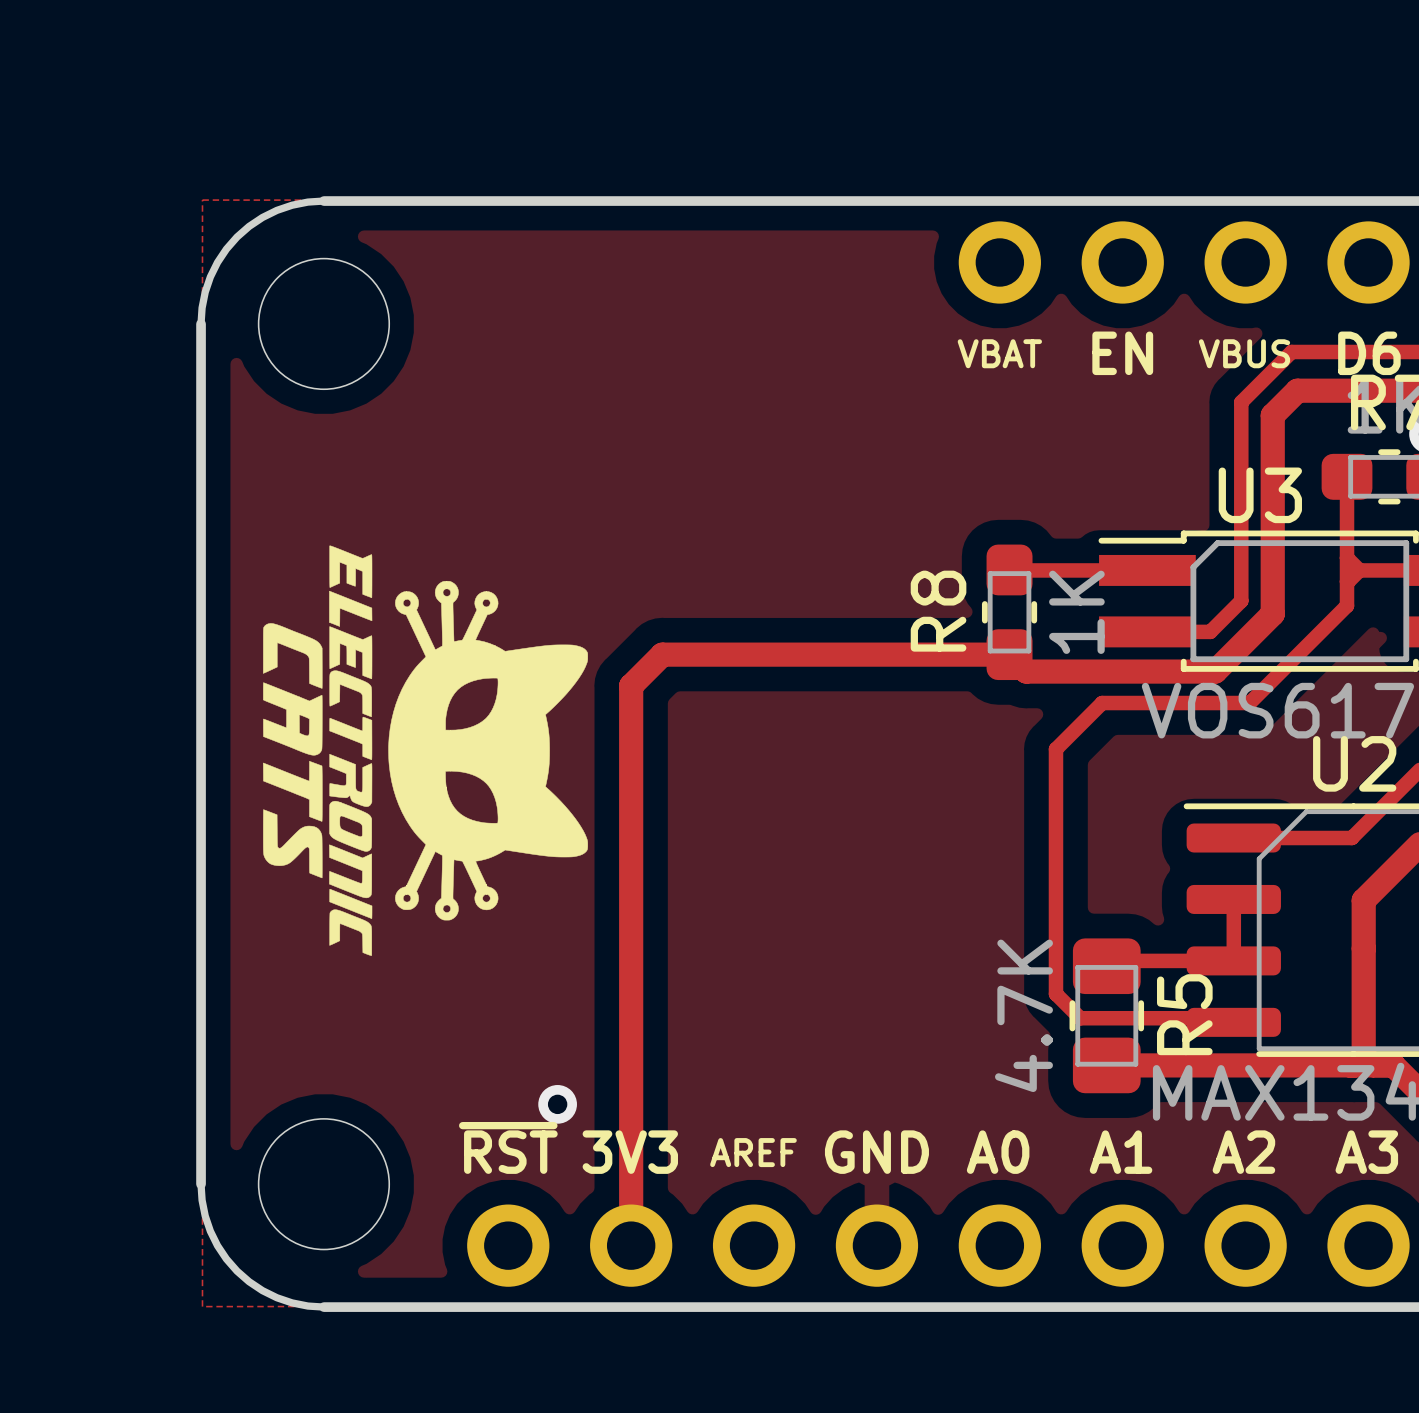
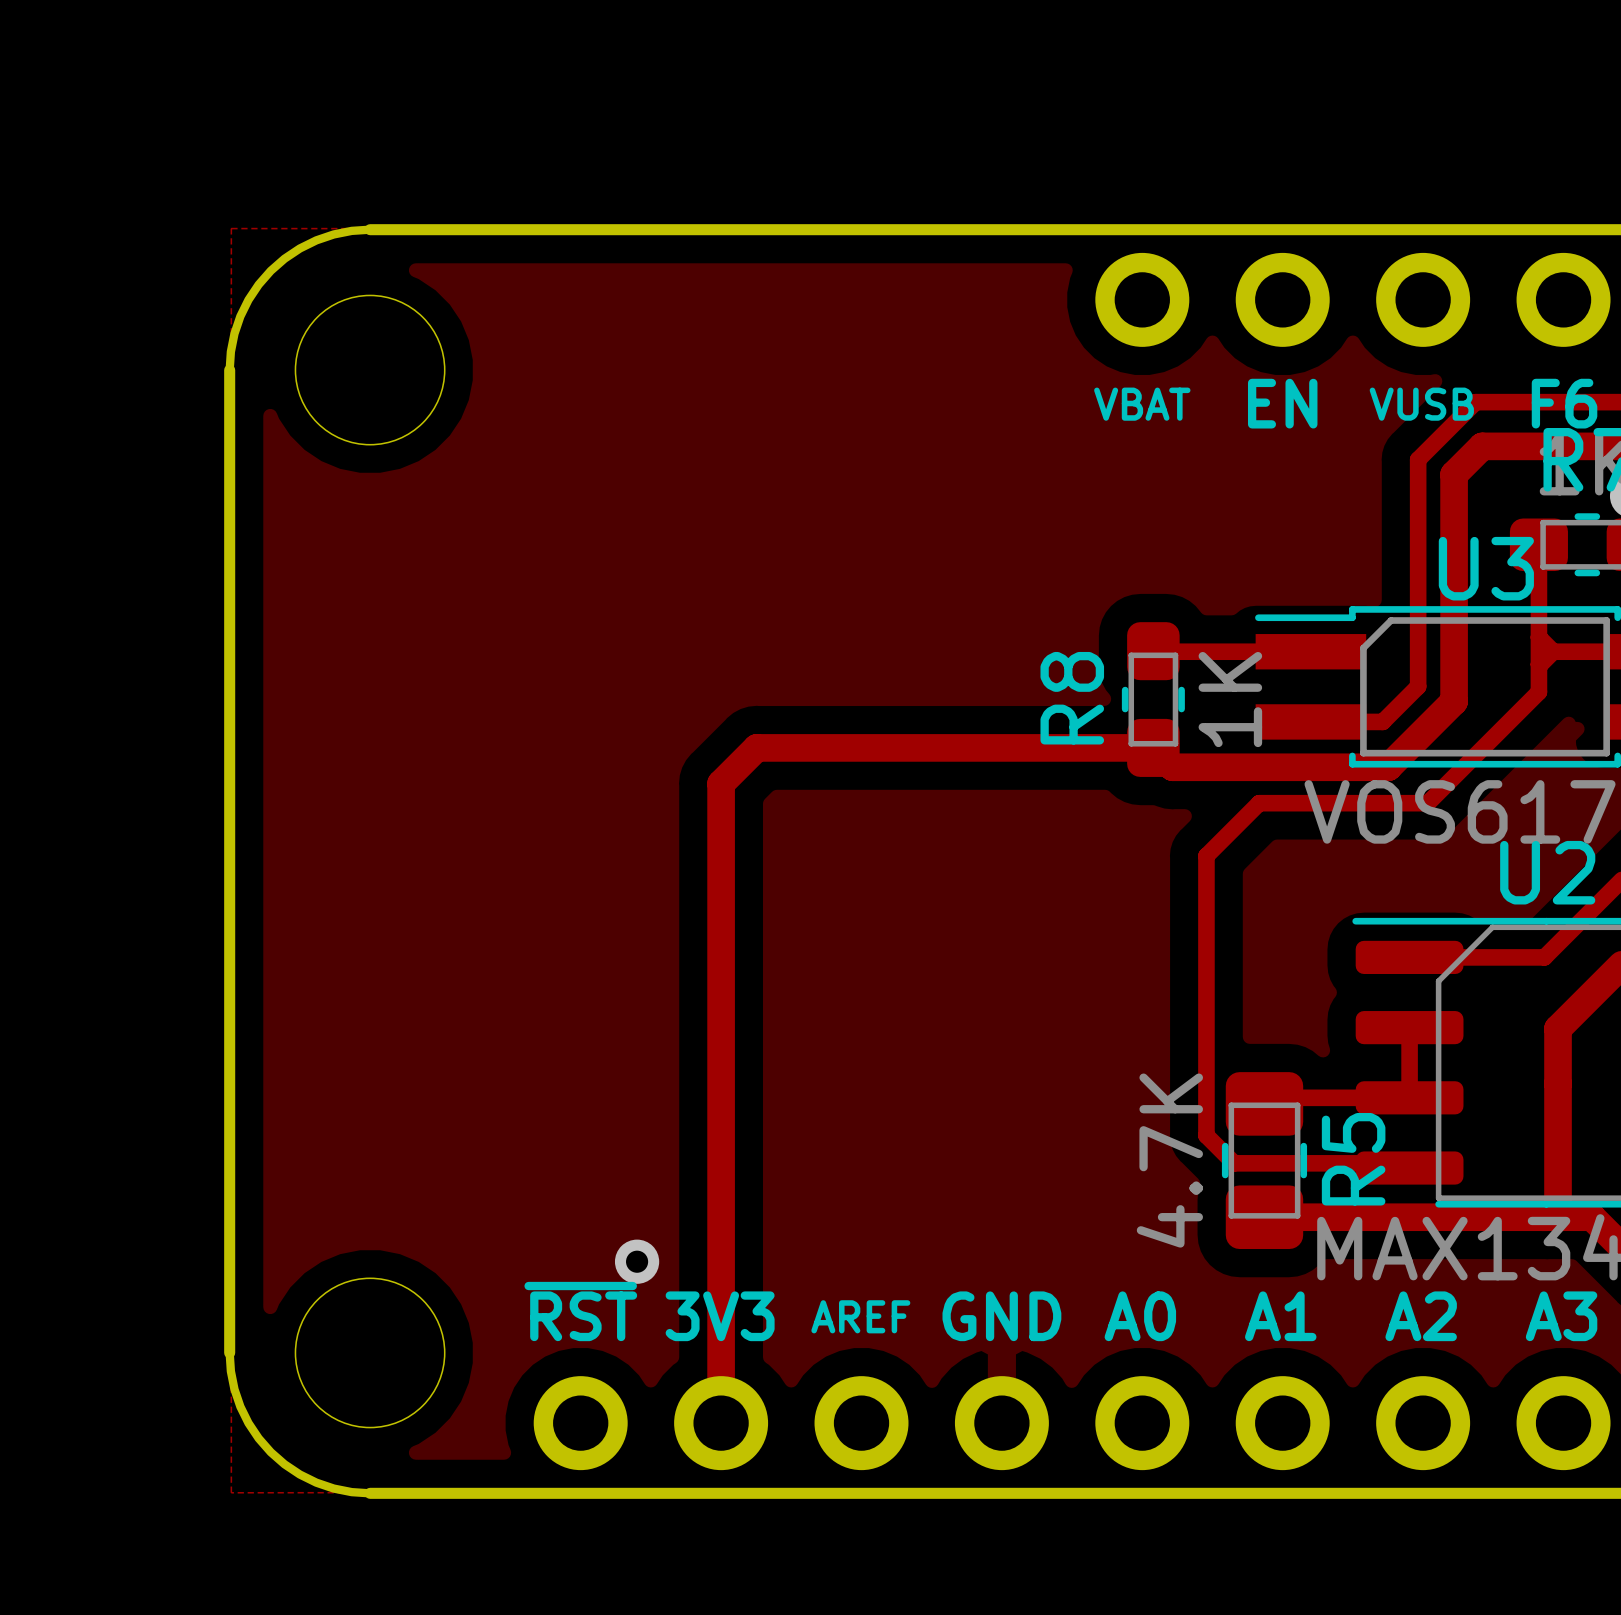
text: VBUS (1244, 353) -> VUSB (1421, 404)
text: D6 (1369, 353) -> F6 (1564, 403)
U3 name position: U3 (1260, 495) -> U3 (1486, 568)
drawing: [263, 545, 589, 956] -> none

